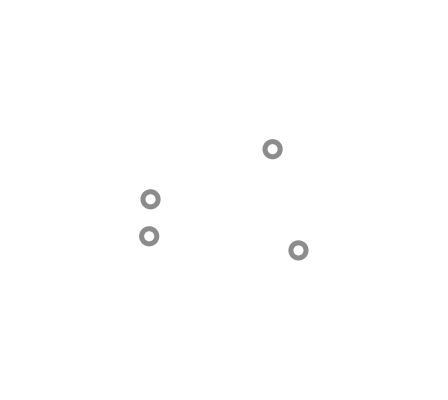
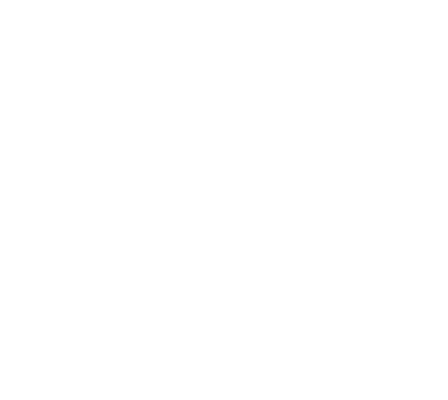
via: (272, 149) -> none
via: (150, 199) -> none
via: (149, 236) -> none
via: (298, 250) -> none

